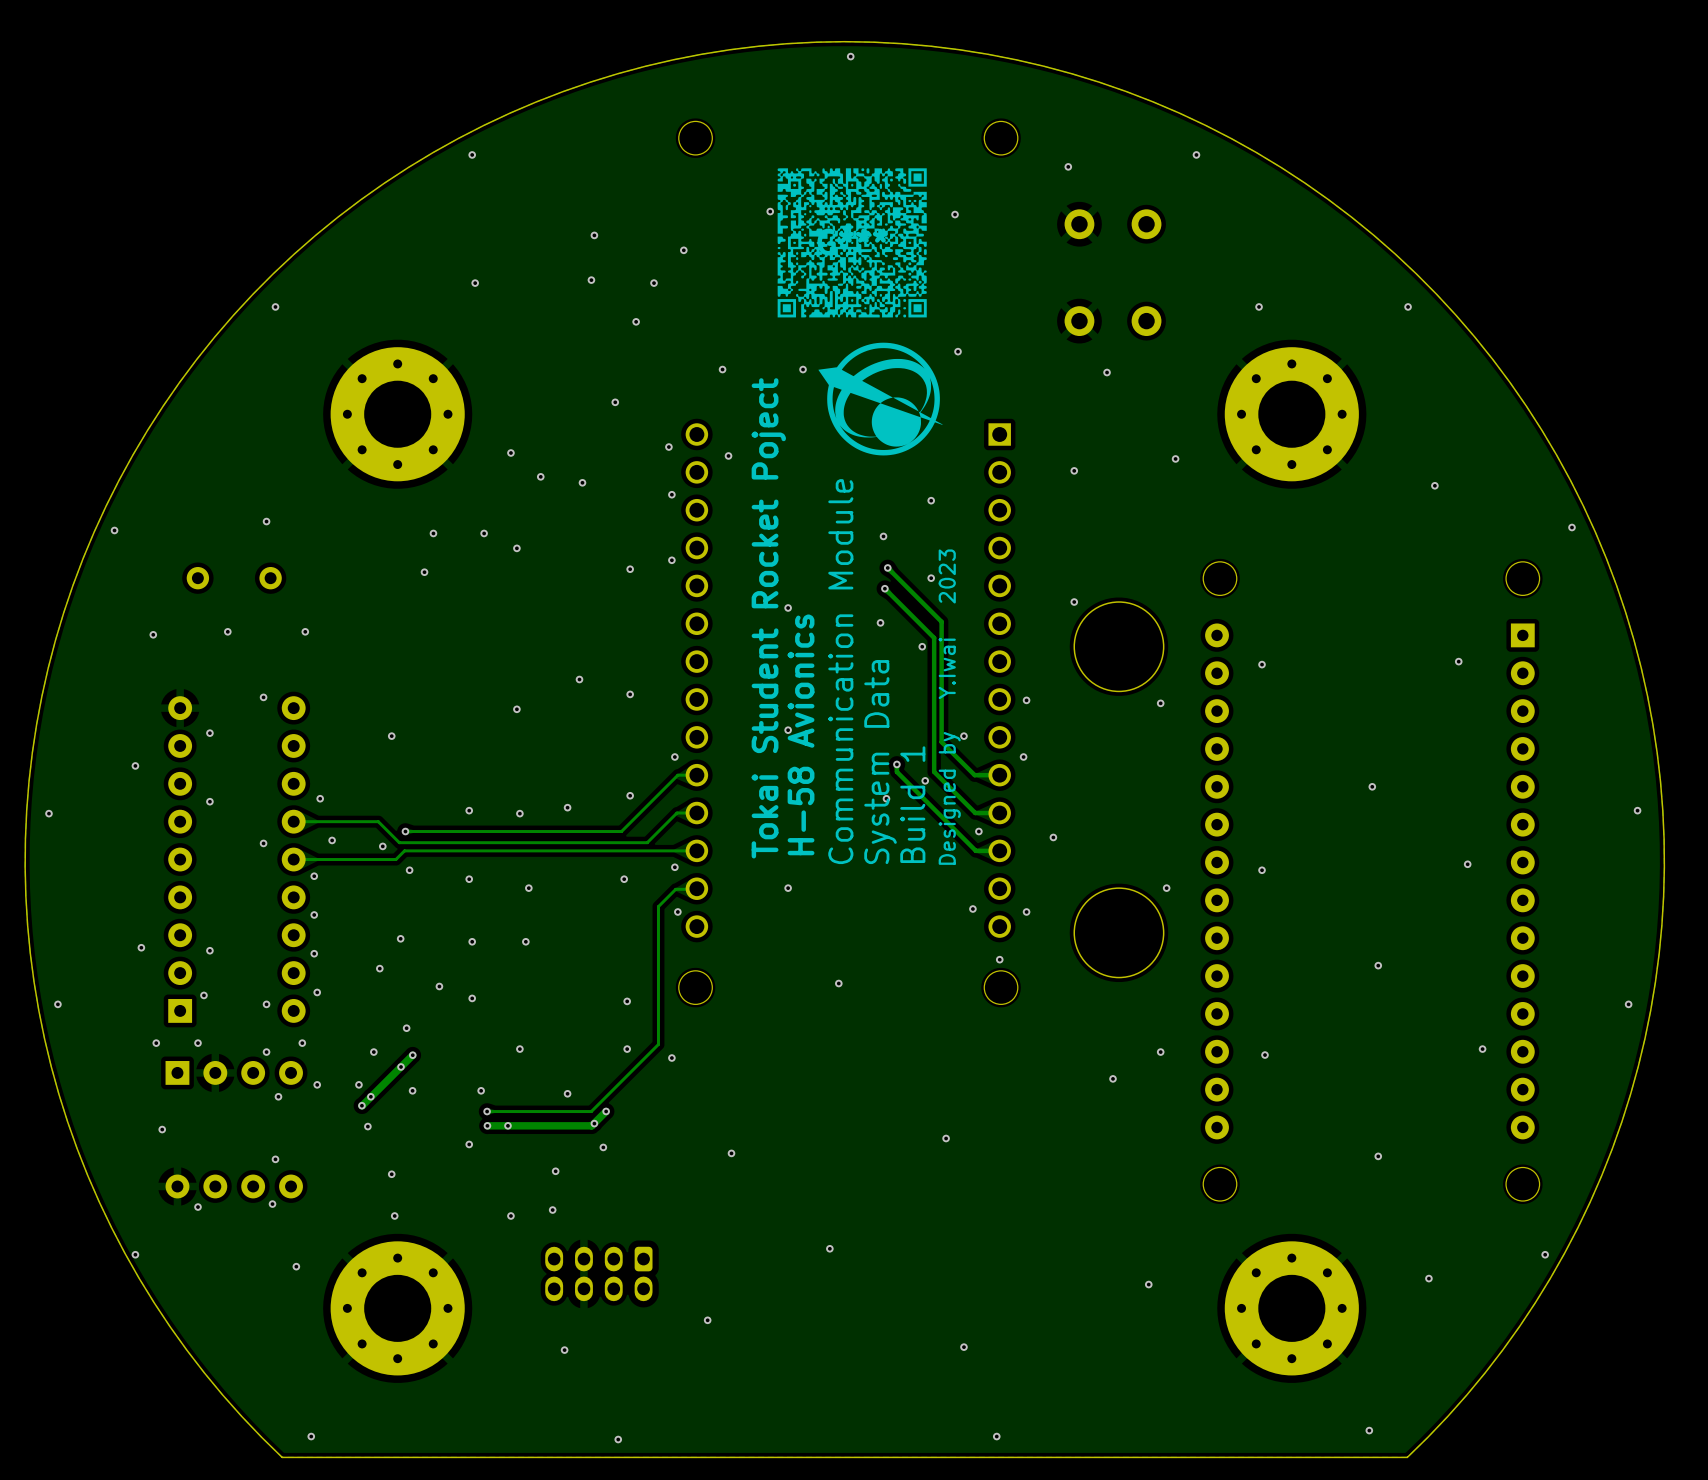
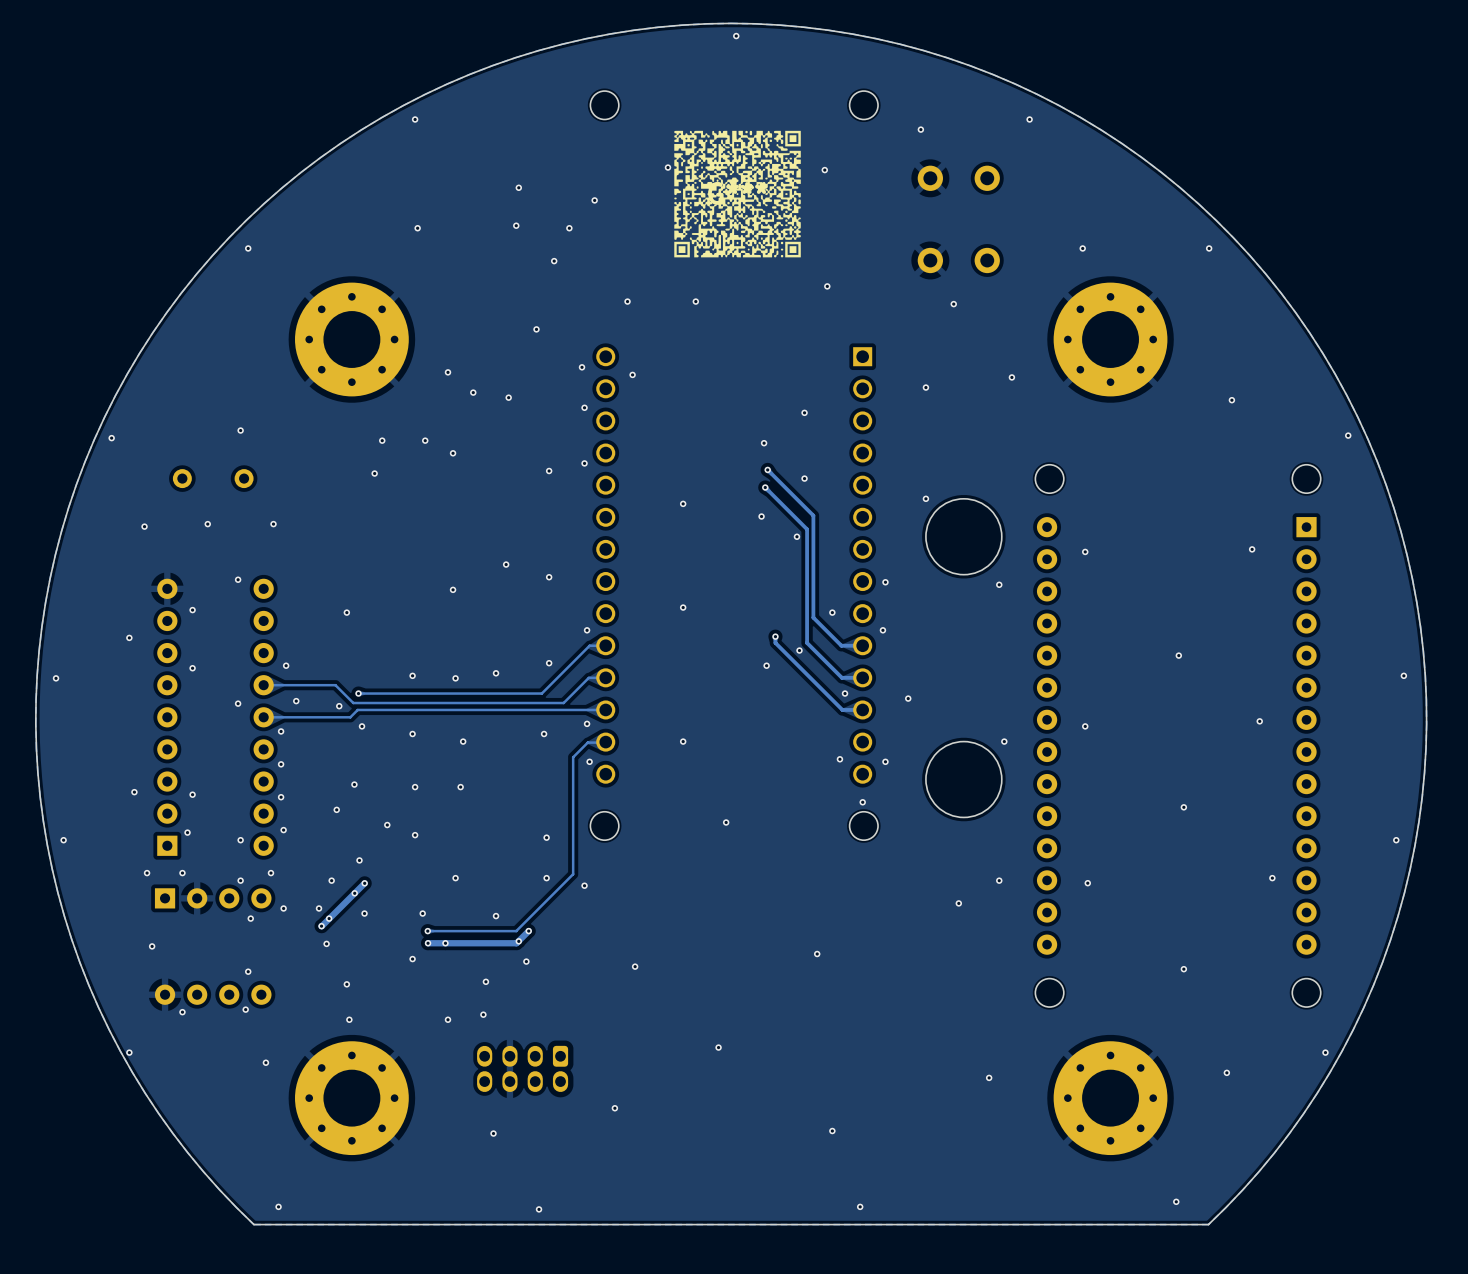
drawing: [818, 342, 943, 456] -> none
text: Tokai Student Rocket Poject (768, 618) -> none
text: Communication Module (840, 671) -> none
text: Designed by Y.Iwai 2023 (949, 707) -> none
text: H-58 Avionics (801, 734) -> none
text: System Data (880, 762) -> none
text: Build 1 (912, 804) -> none

